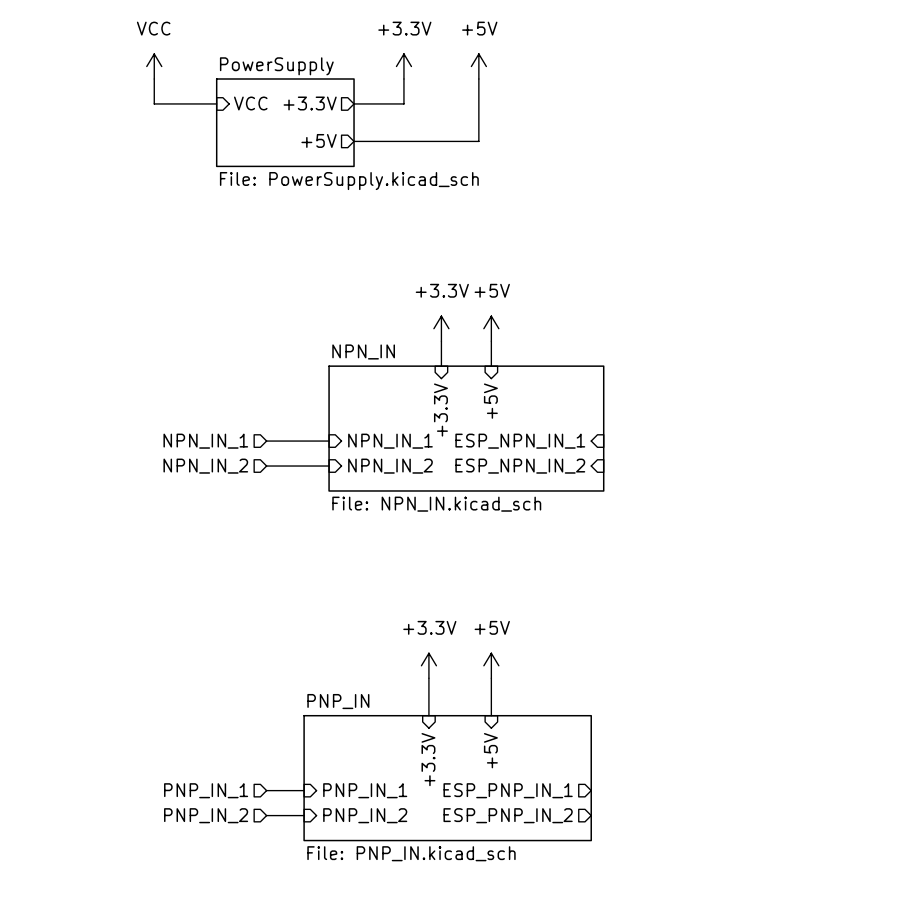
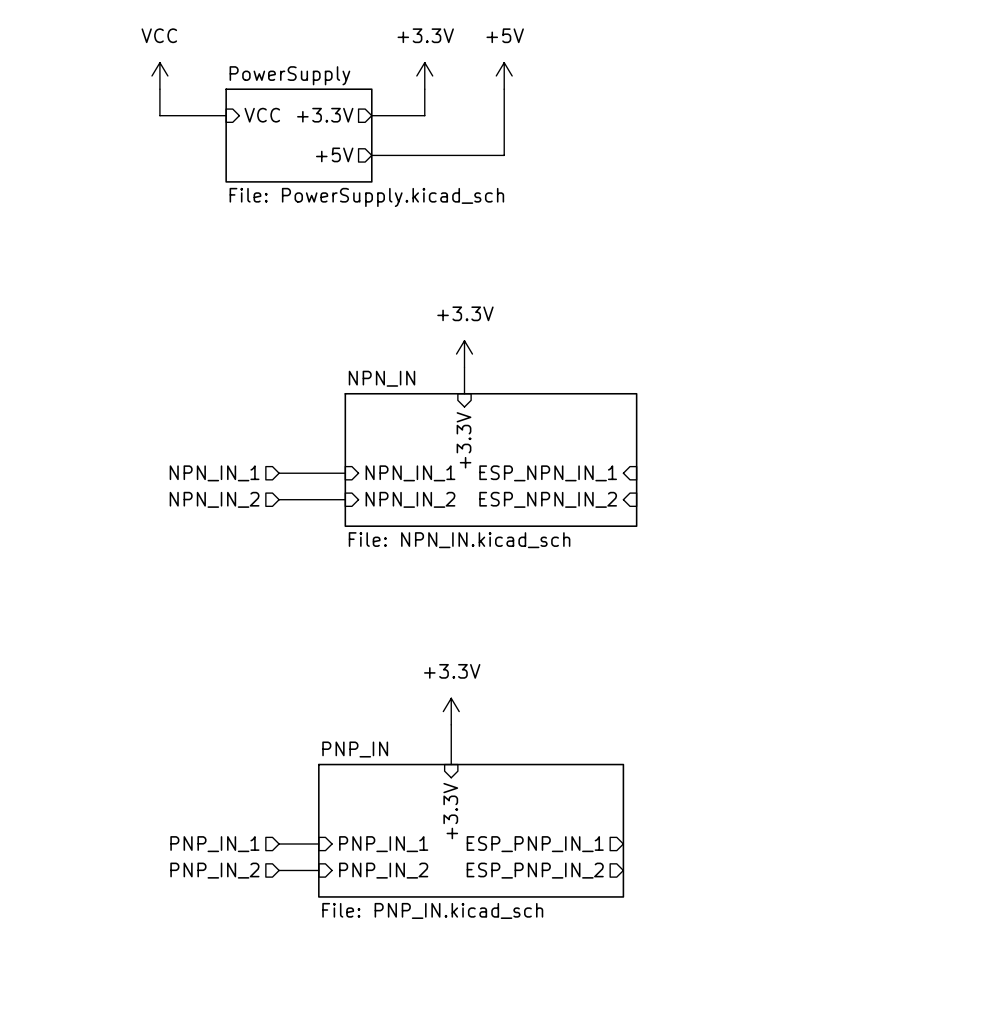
power symbol: +5V (491, 328) -> none
wire: (491, 341) (491, 366) -> none
sheet pin: +5V (490, 401) -> none
power symbol: +5V (491, 665) -> none
wire: (491, 678) (491, 715) -> none
sheet pin: +5V (490, 750) -> none

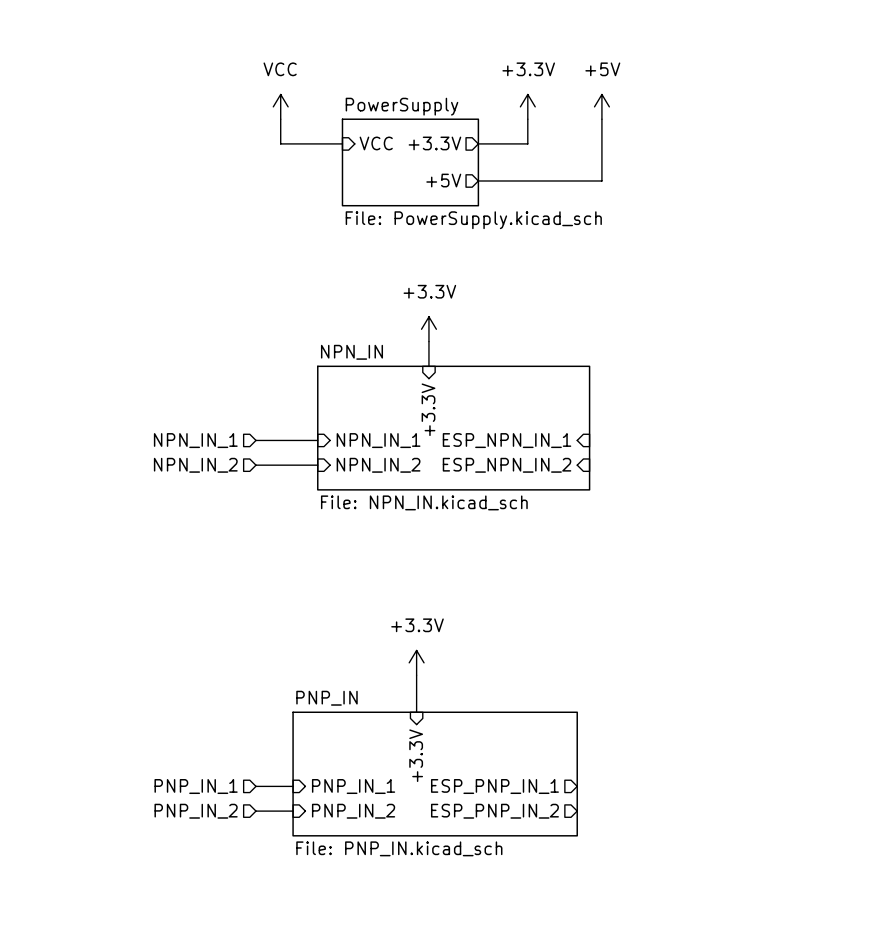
power symbol position: VCC (159, 75) -> VCC (280, 106)
power symbol position: +3.3V (424, 75) -> +3.3V (527, 106)
power symbol position: +5V (504, 75) -> +5V (601, 106)
wire: (159, 89) (159, 115) (226, 115) -> none
wire: (424, 89) (424, 115) (371, 115) -> (527, 119) (527, 143) (478, 143)
wire: (504, 89) (504, 155) (371, 155) -> (280, 119) (280, 143) (342, 143)
sheet pin position: VCC (262, 115) -> VCC (376, 143)
sheet pin position: +3.3V (325, 115) -> +3.3V (434, 143)
wire: none -> (601, 119) (601, 180) (478, 180)
sheet PowerSupply position: (298, 135) -> (410, 162)
sheet pin position: +5V (334, 154) -> +5V (443, 180)

